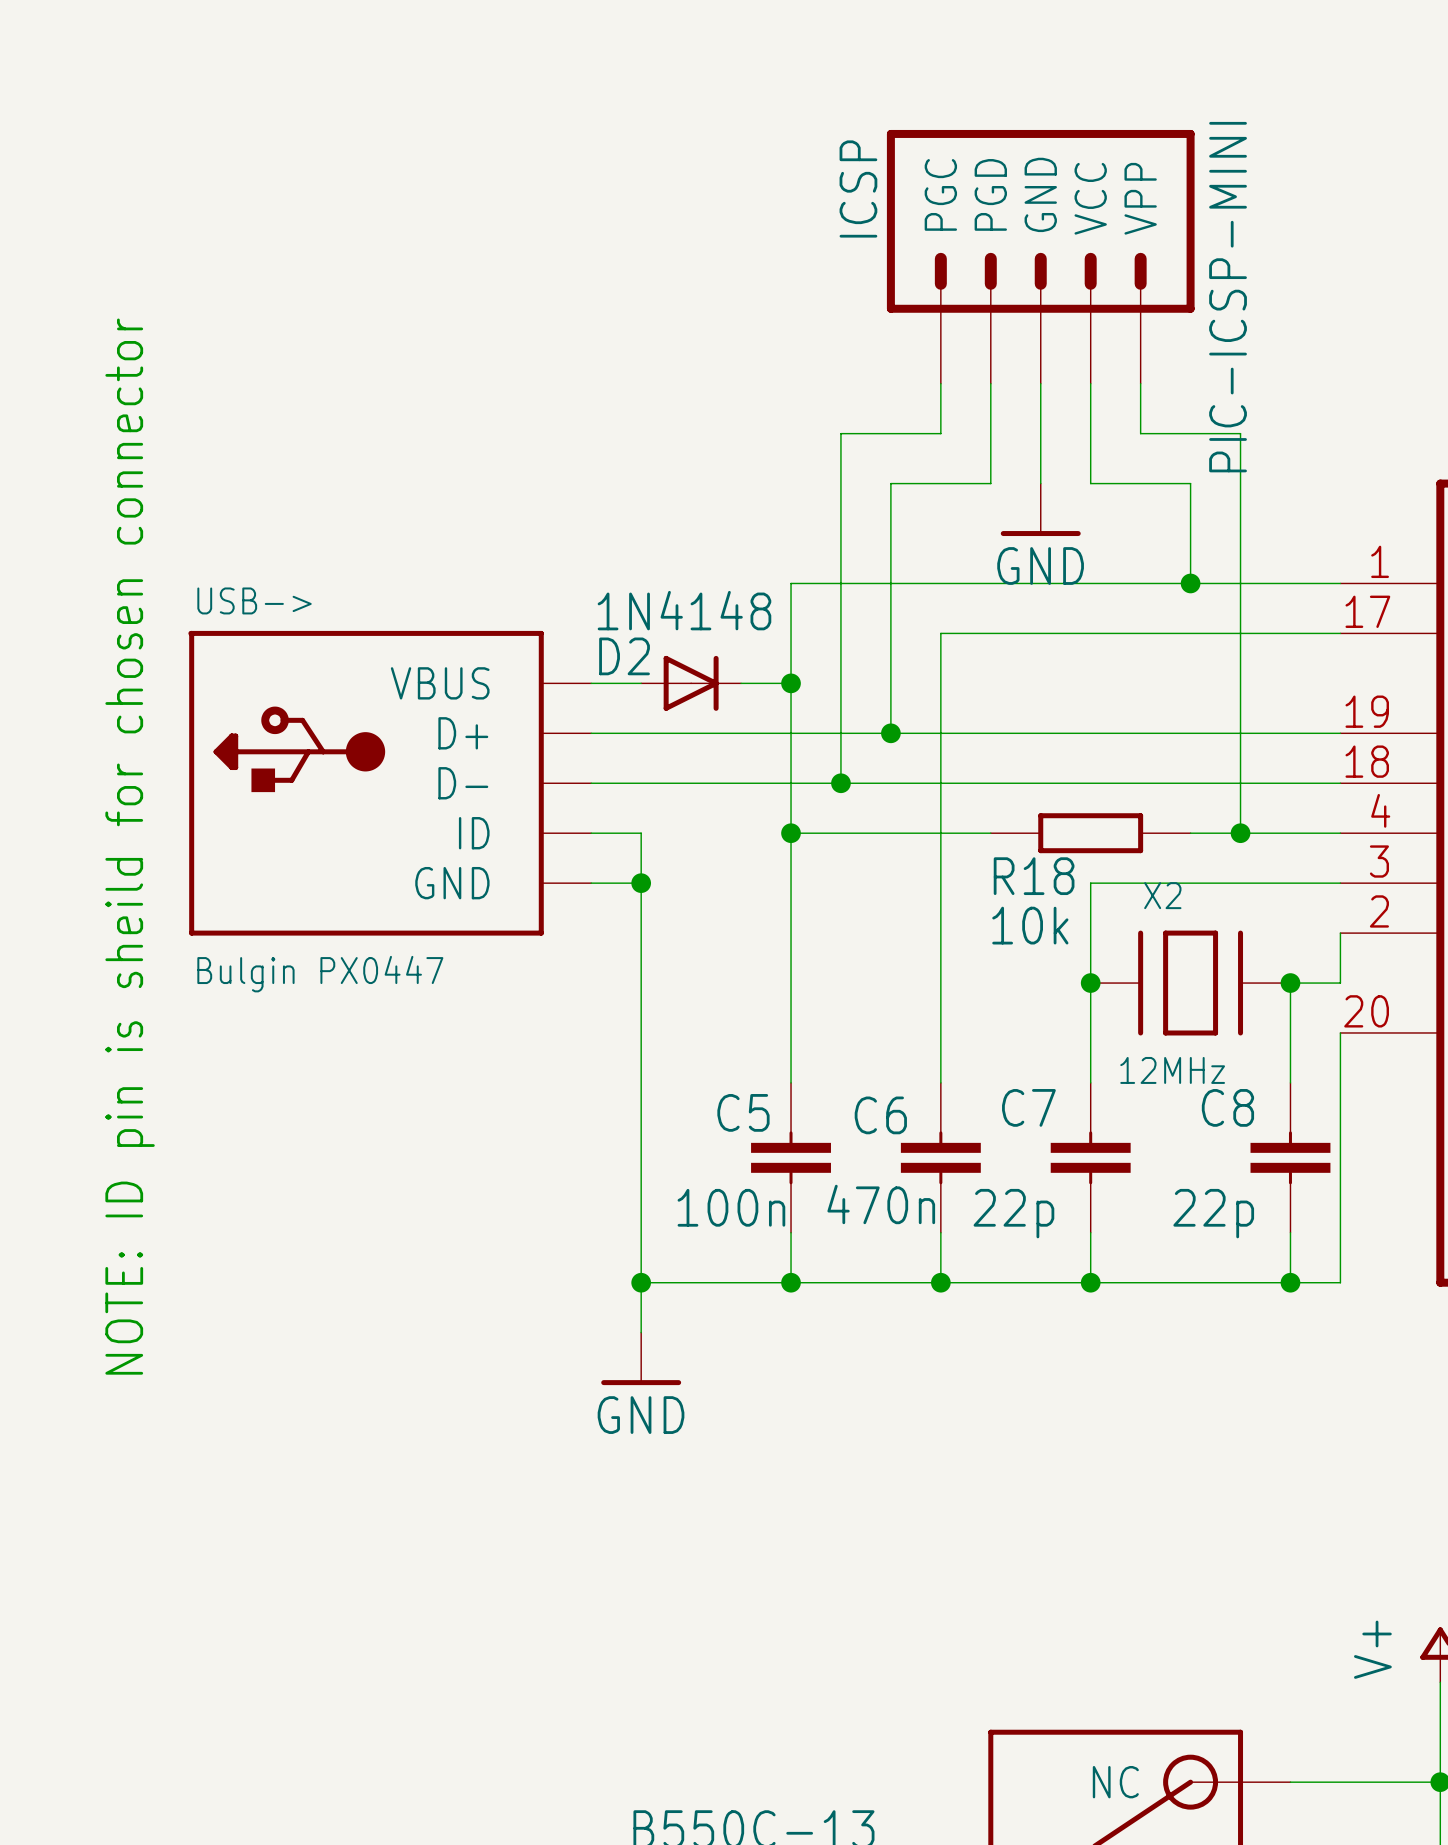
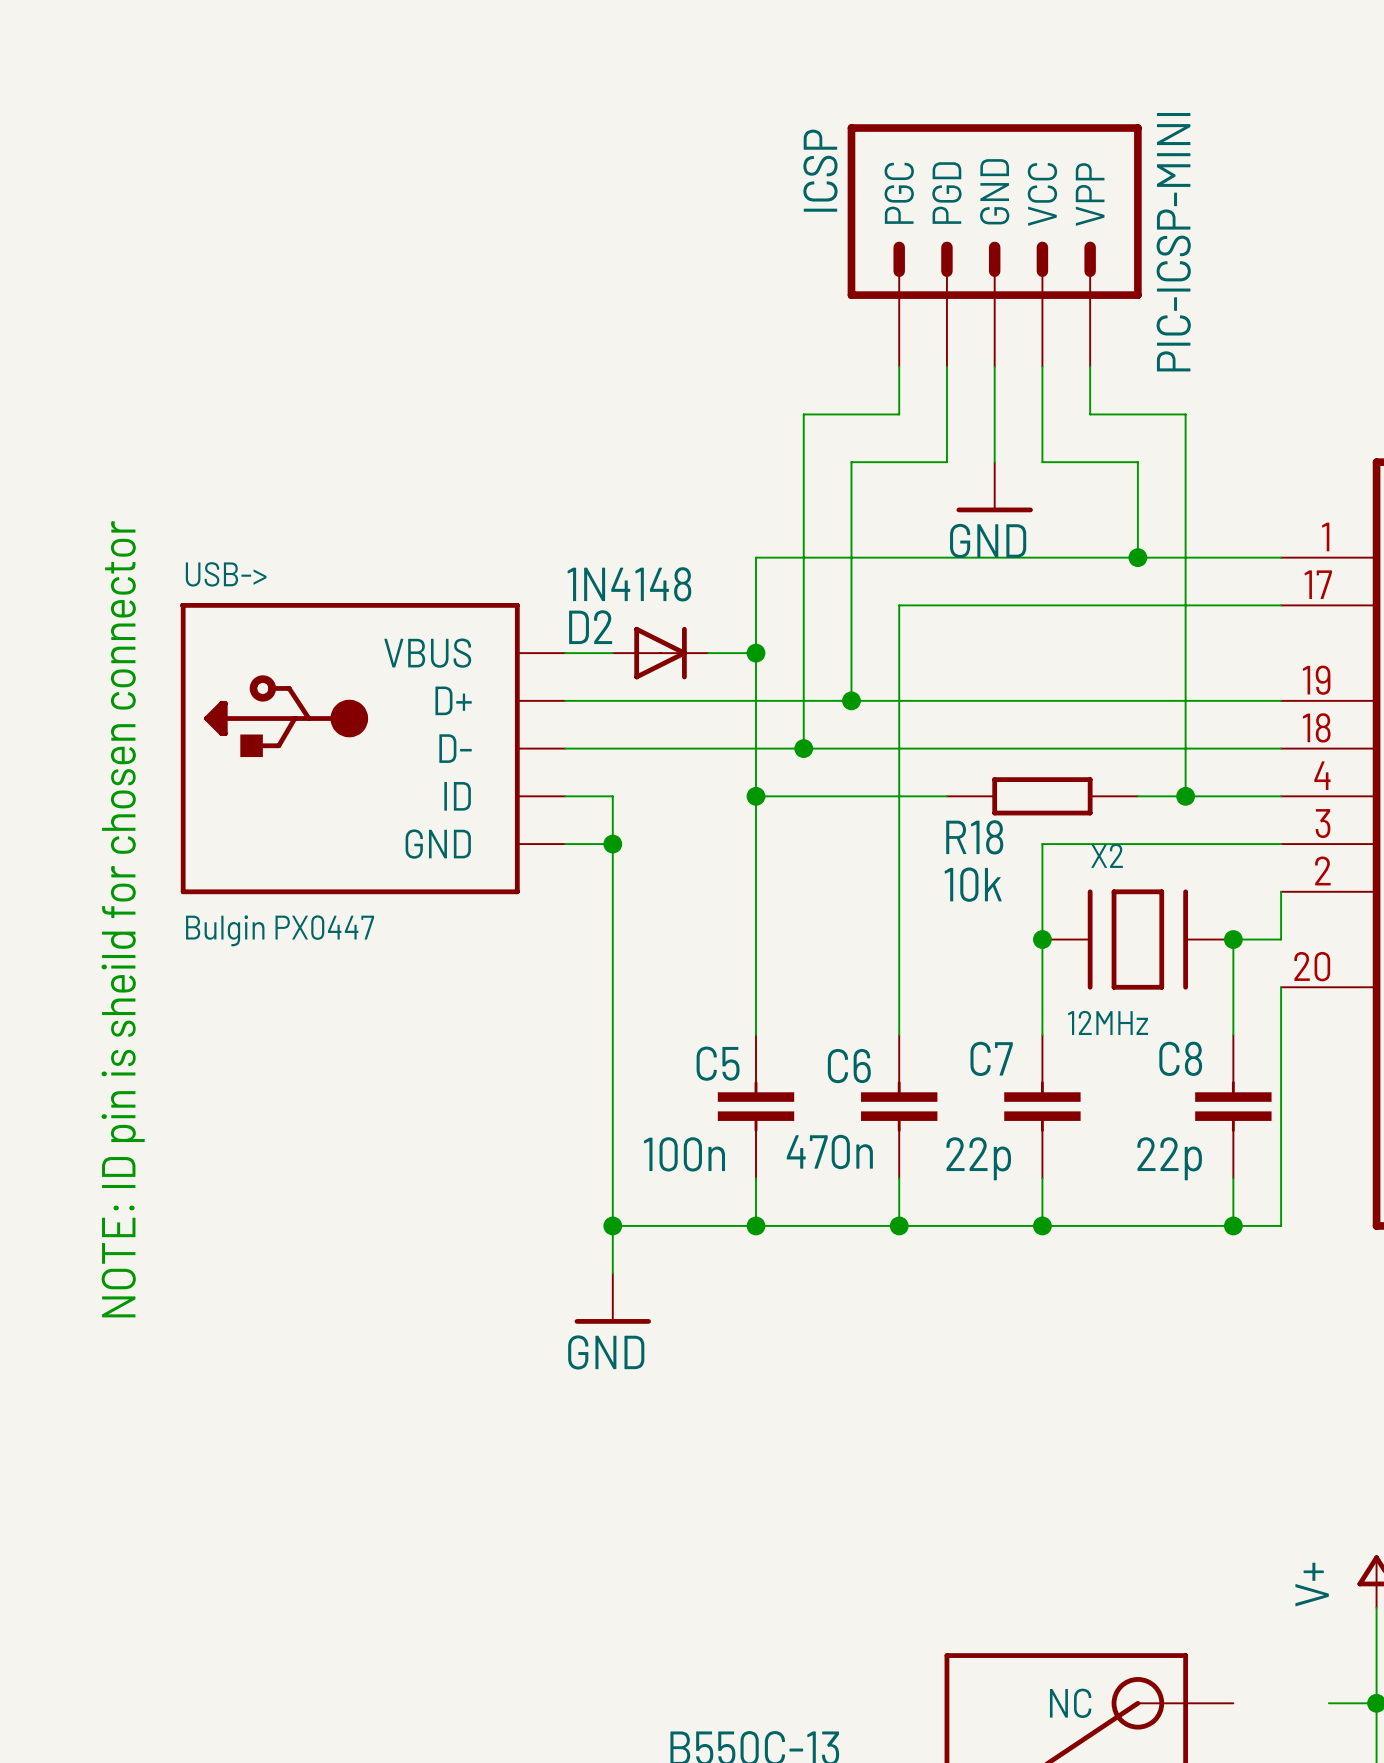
wire: (1290, 1782) (1390, 1782) -> none

